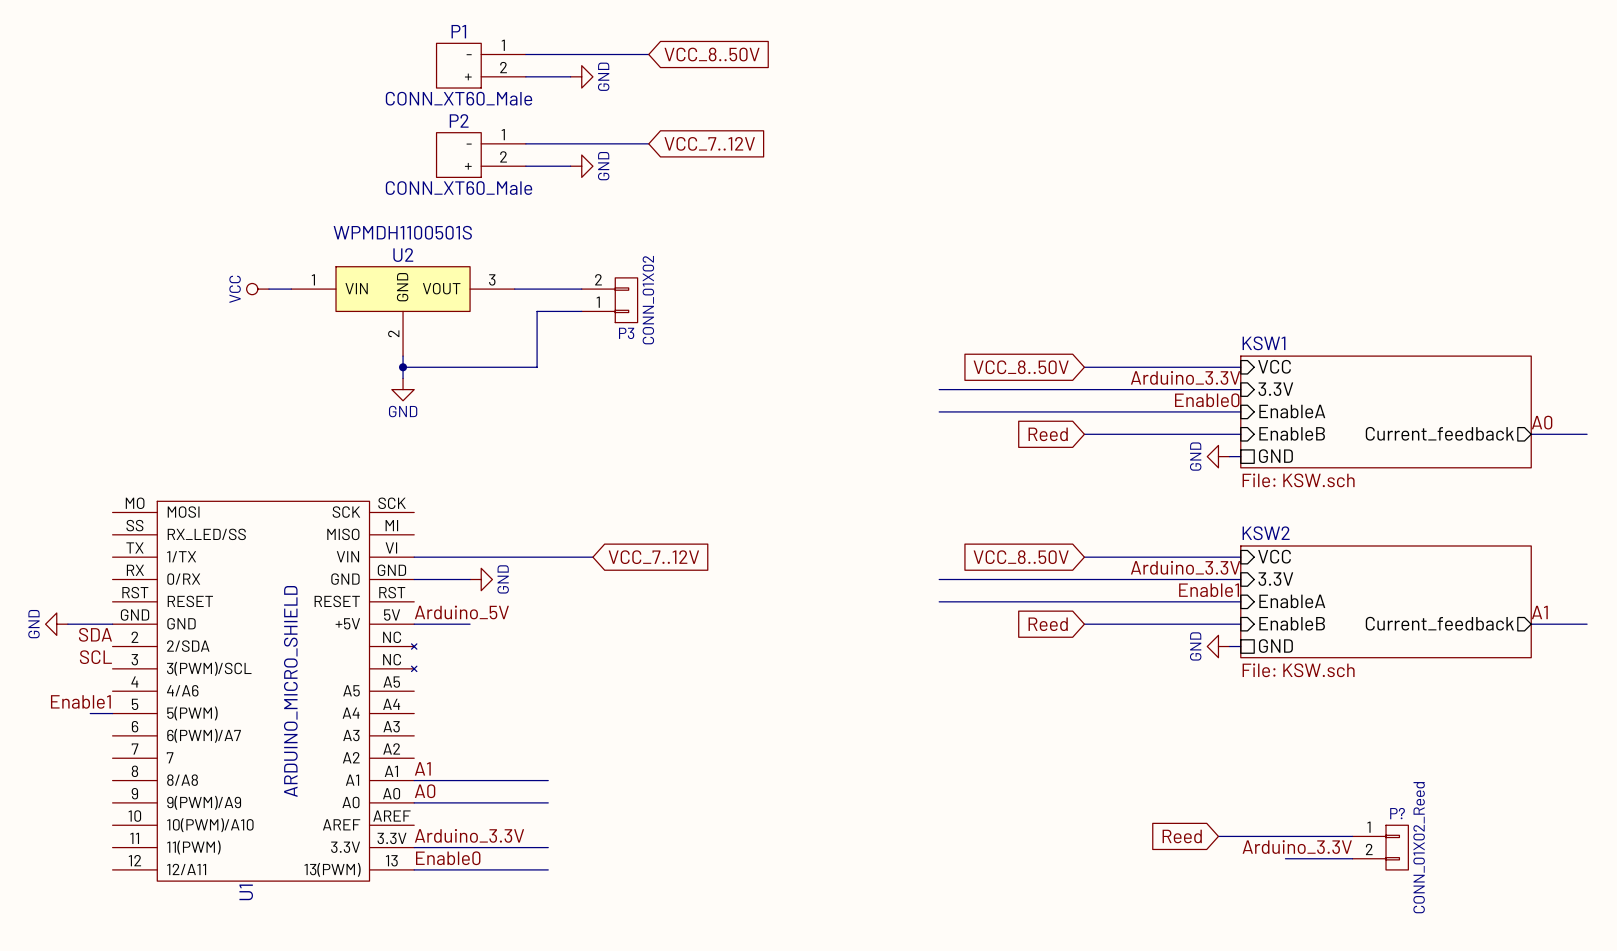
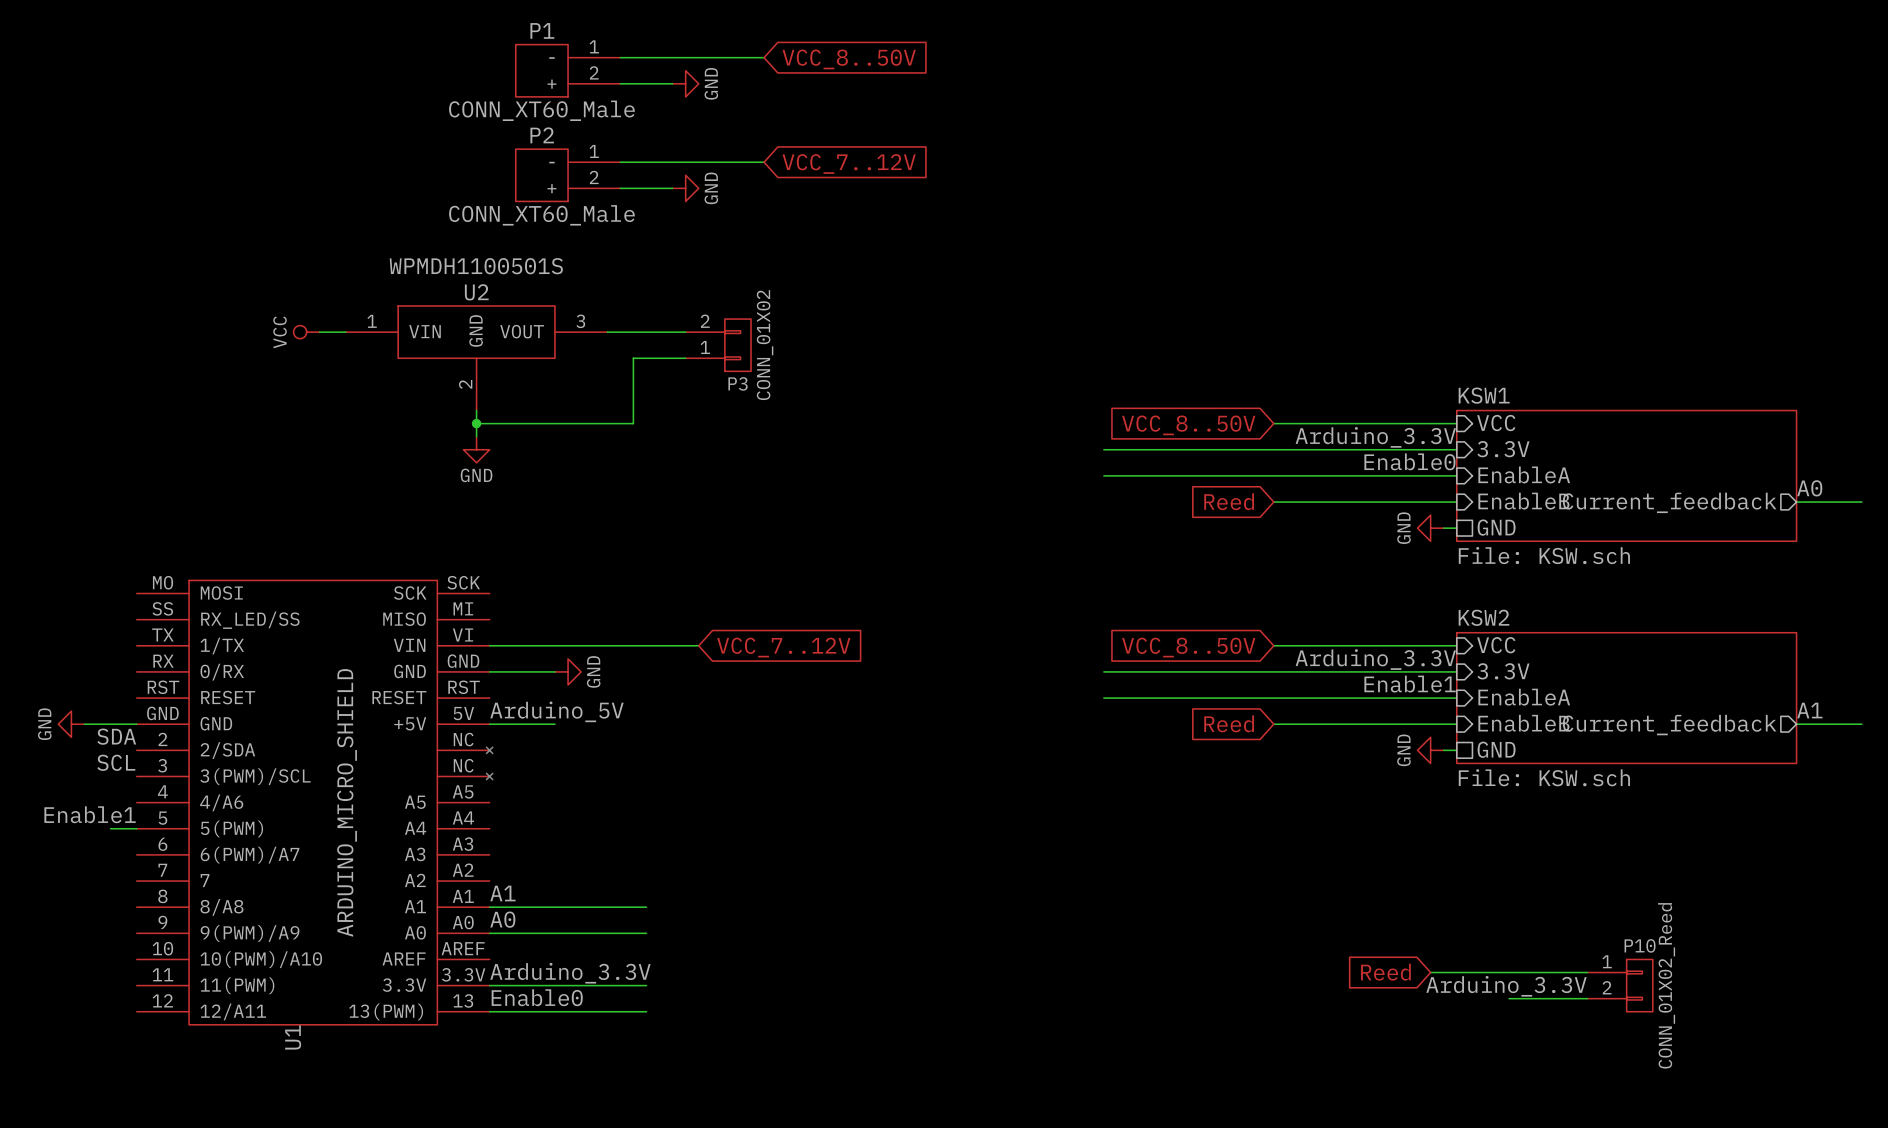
P? name: P? (1397, 813) -> P10 (1640, 945)

